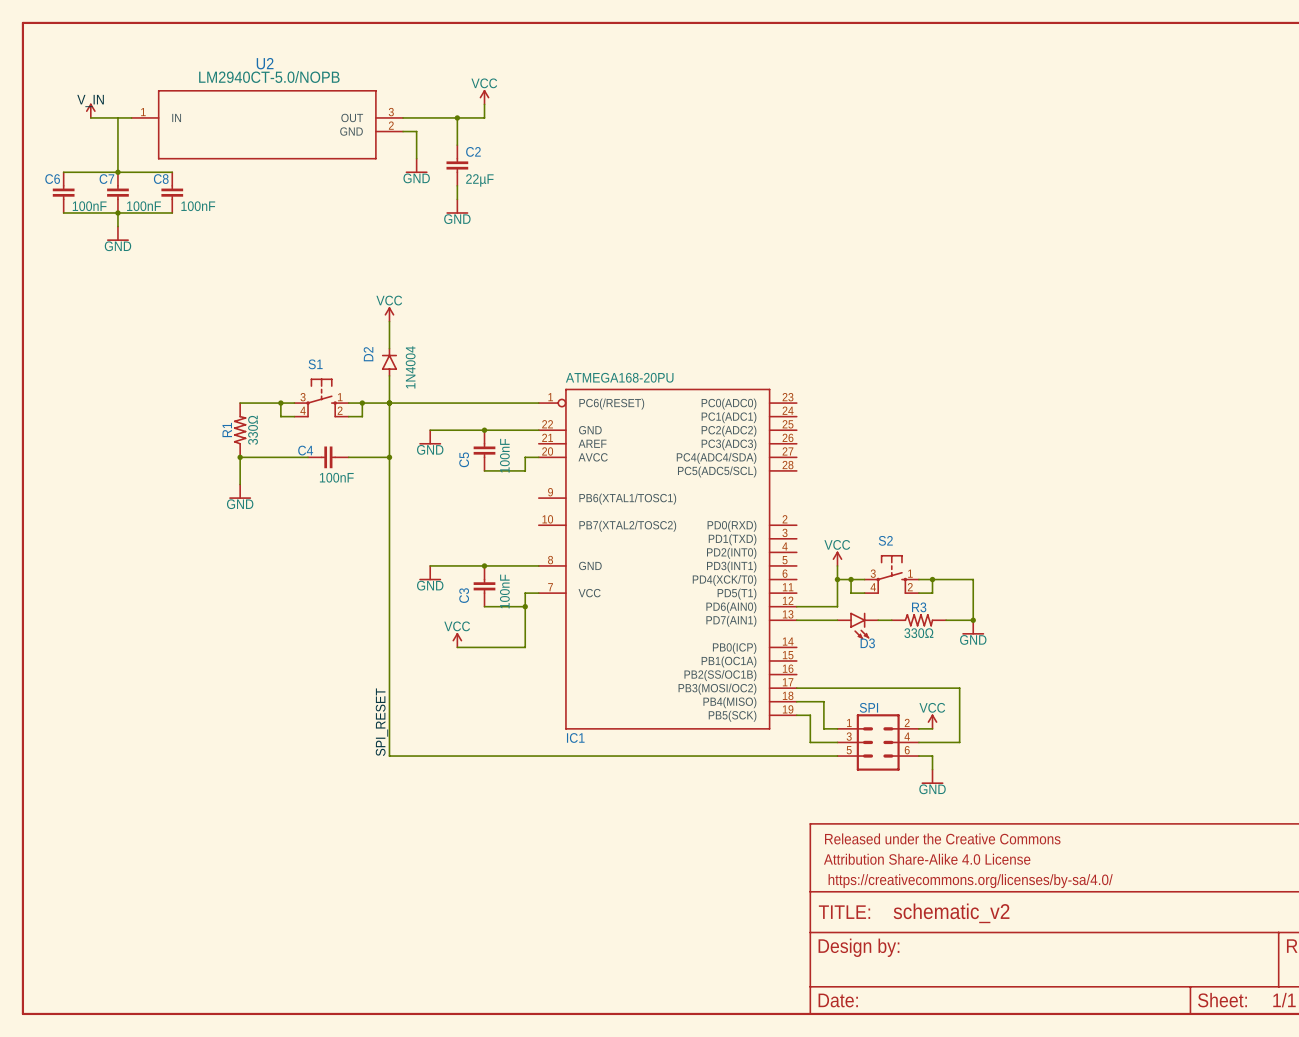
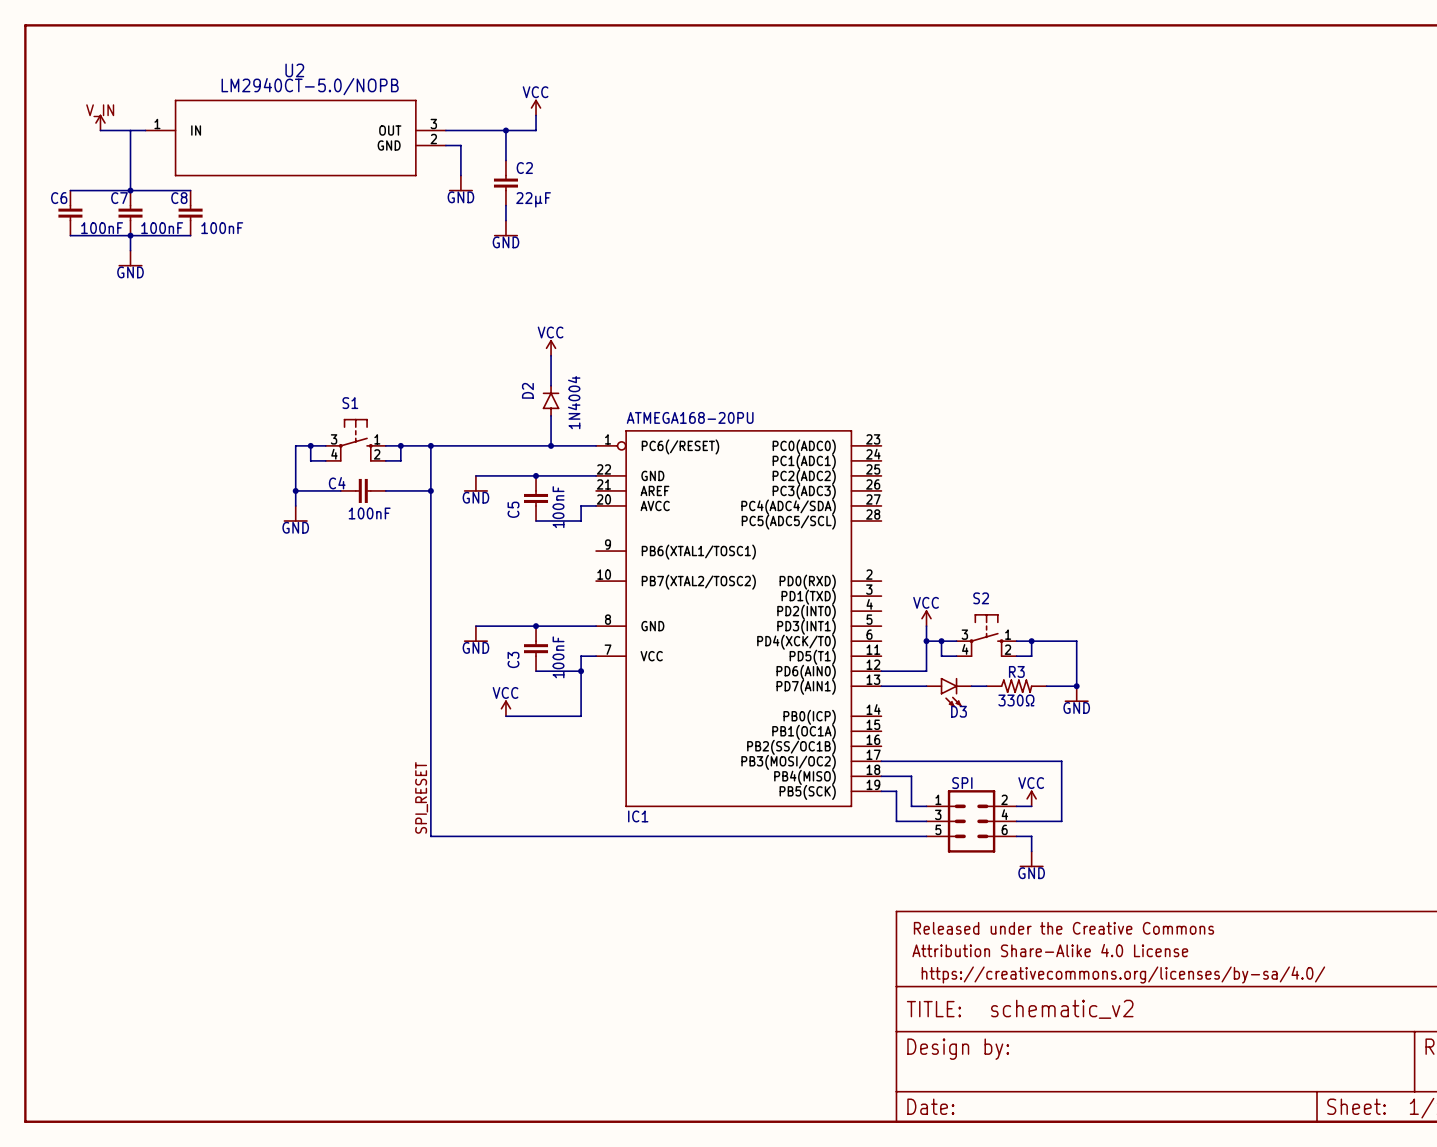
power symbol position: VCC (389, 314) -> VCC (551, 347)
wire: (389, 321) (389, 348) -> (551, 355) (551, 385)
D2 position: (389, 362) -> (551, 400)
wire: (389, 375) (389, 403) -> (551, 415) (551, 445)
wire: (240, 403) (267, 403) -> (295, 505) (295, 445)
junction: none -> (551, 445)
R1: 330Ω (240, 430) -> none
wire: none -> (295, 490) (340, 490)
junction position: (240, 457) -> (295, 490)
wire: (308, 457) (240, 457) (240, 484) -> none
C4 position: (328, 457) -> (363, 490)
wire: (348, 457) (389, 457) -> (385, 490) (430, 490)
junction position: (389, 457) -> (430, 490)
power symbol position: GND (240, 491) -> GND (295, 513)

